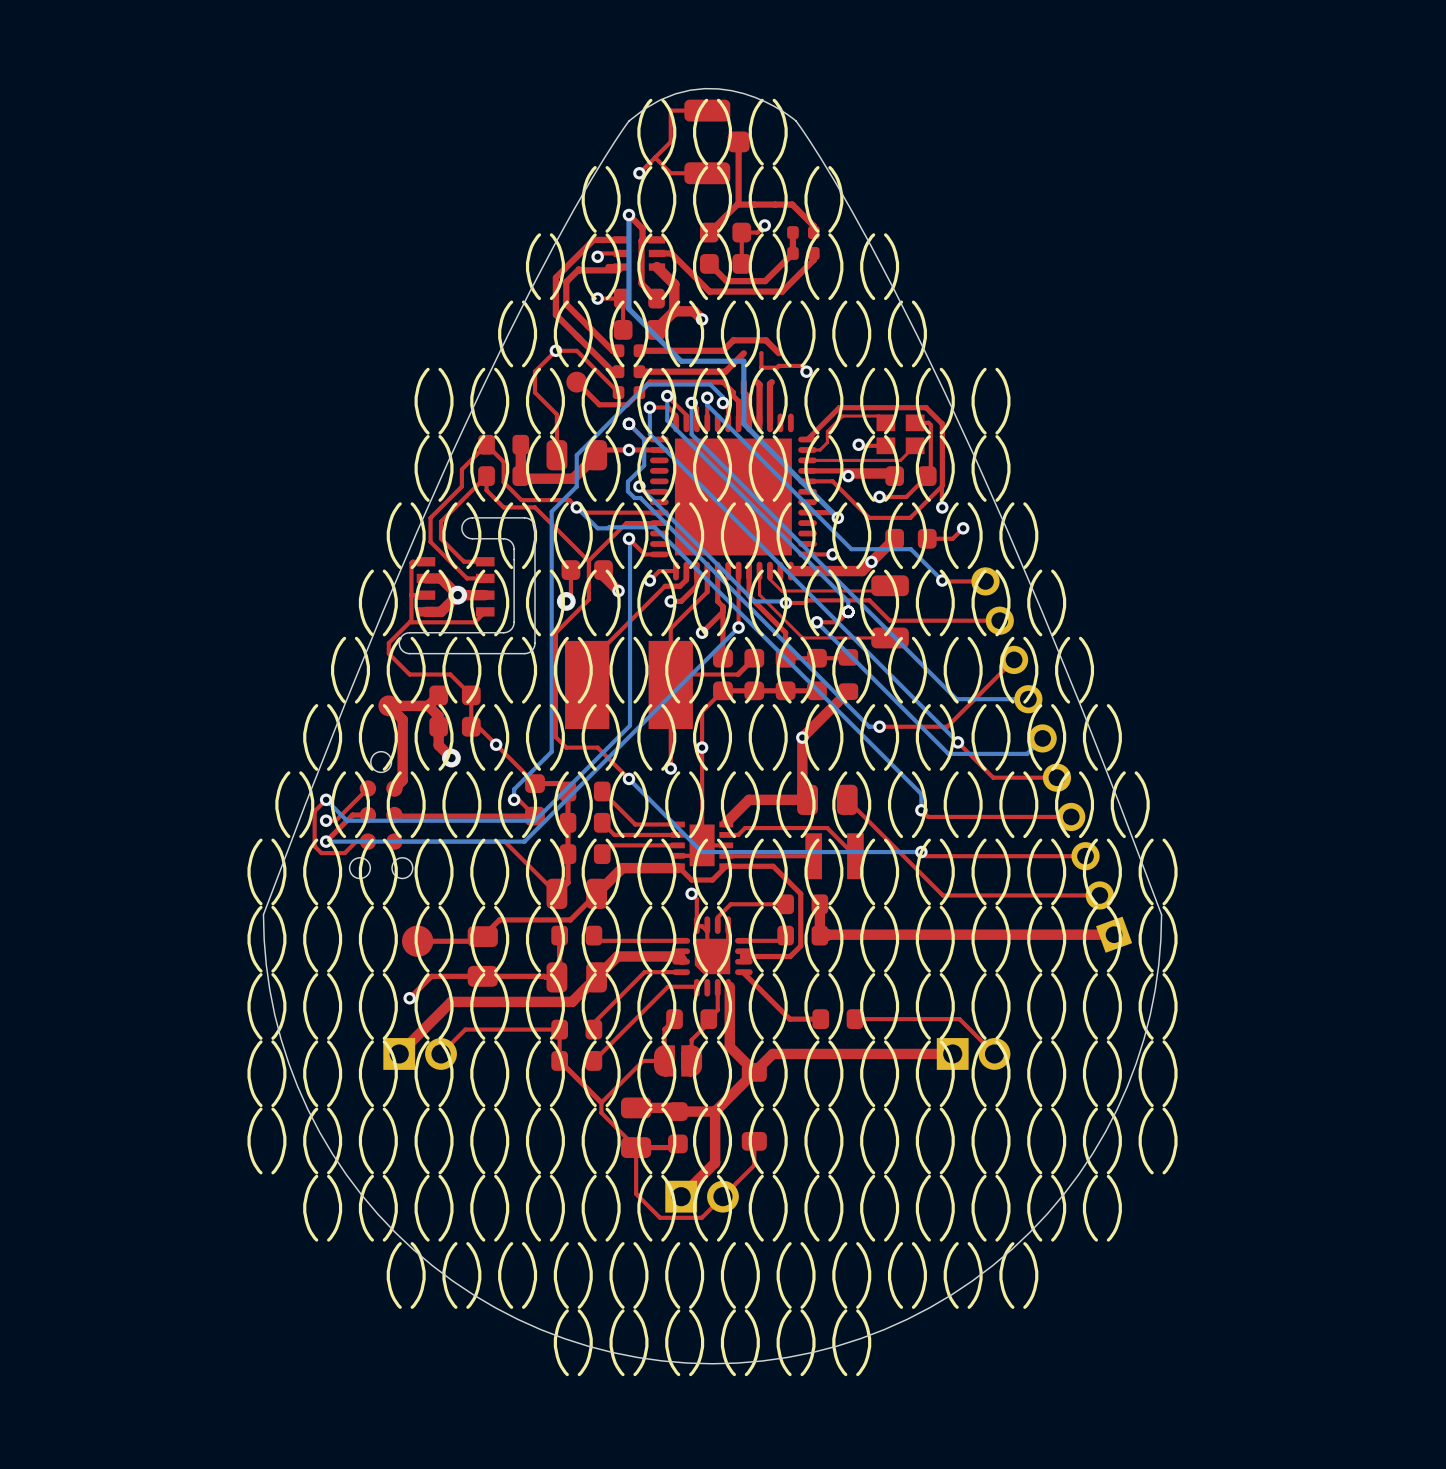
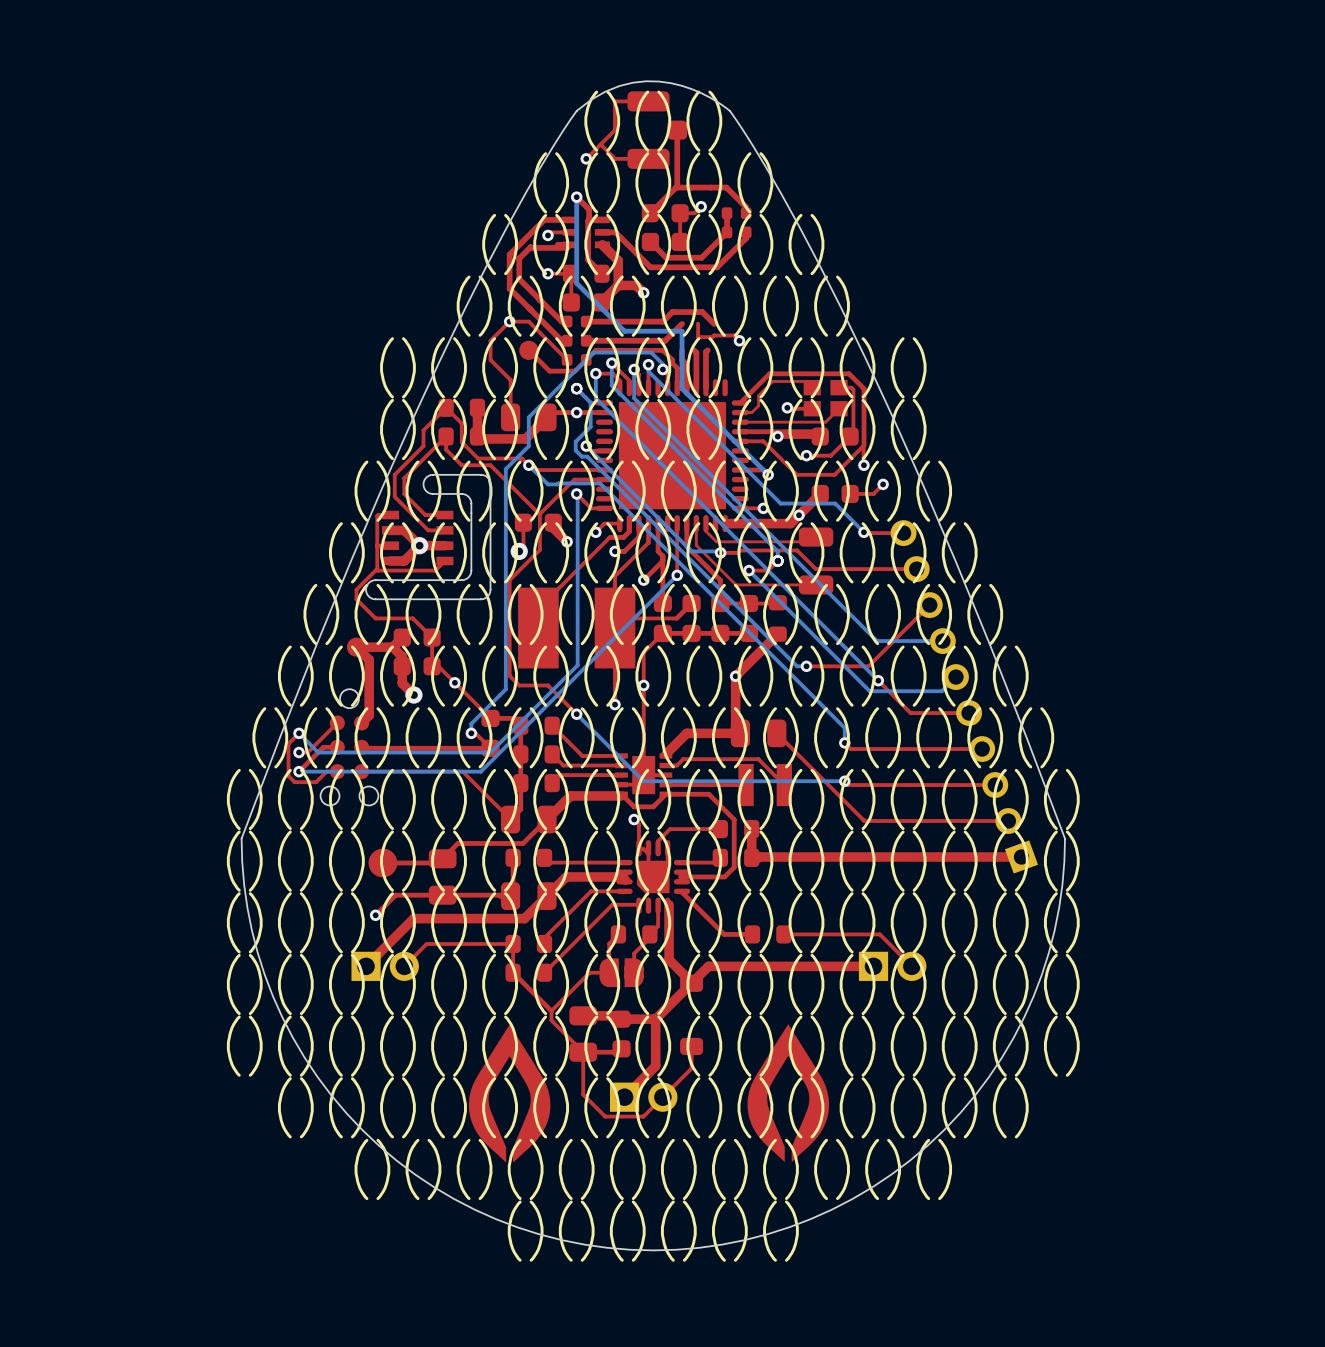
drawing: none -> [468, 1024, 551, 1163]
drawing: none -> [747, 1024, 830, 1163]

